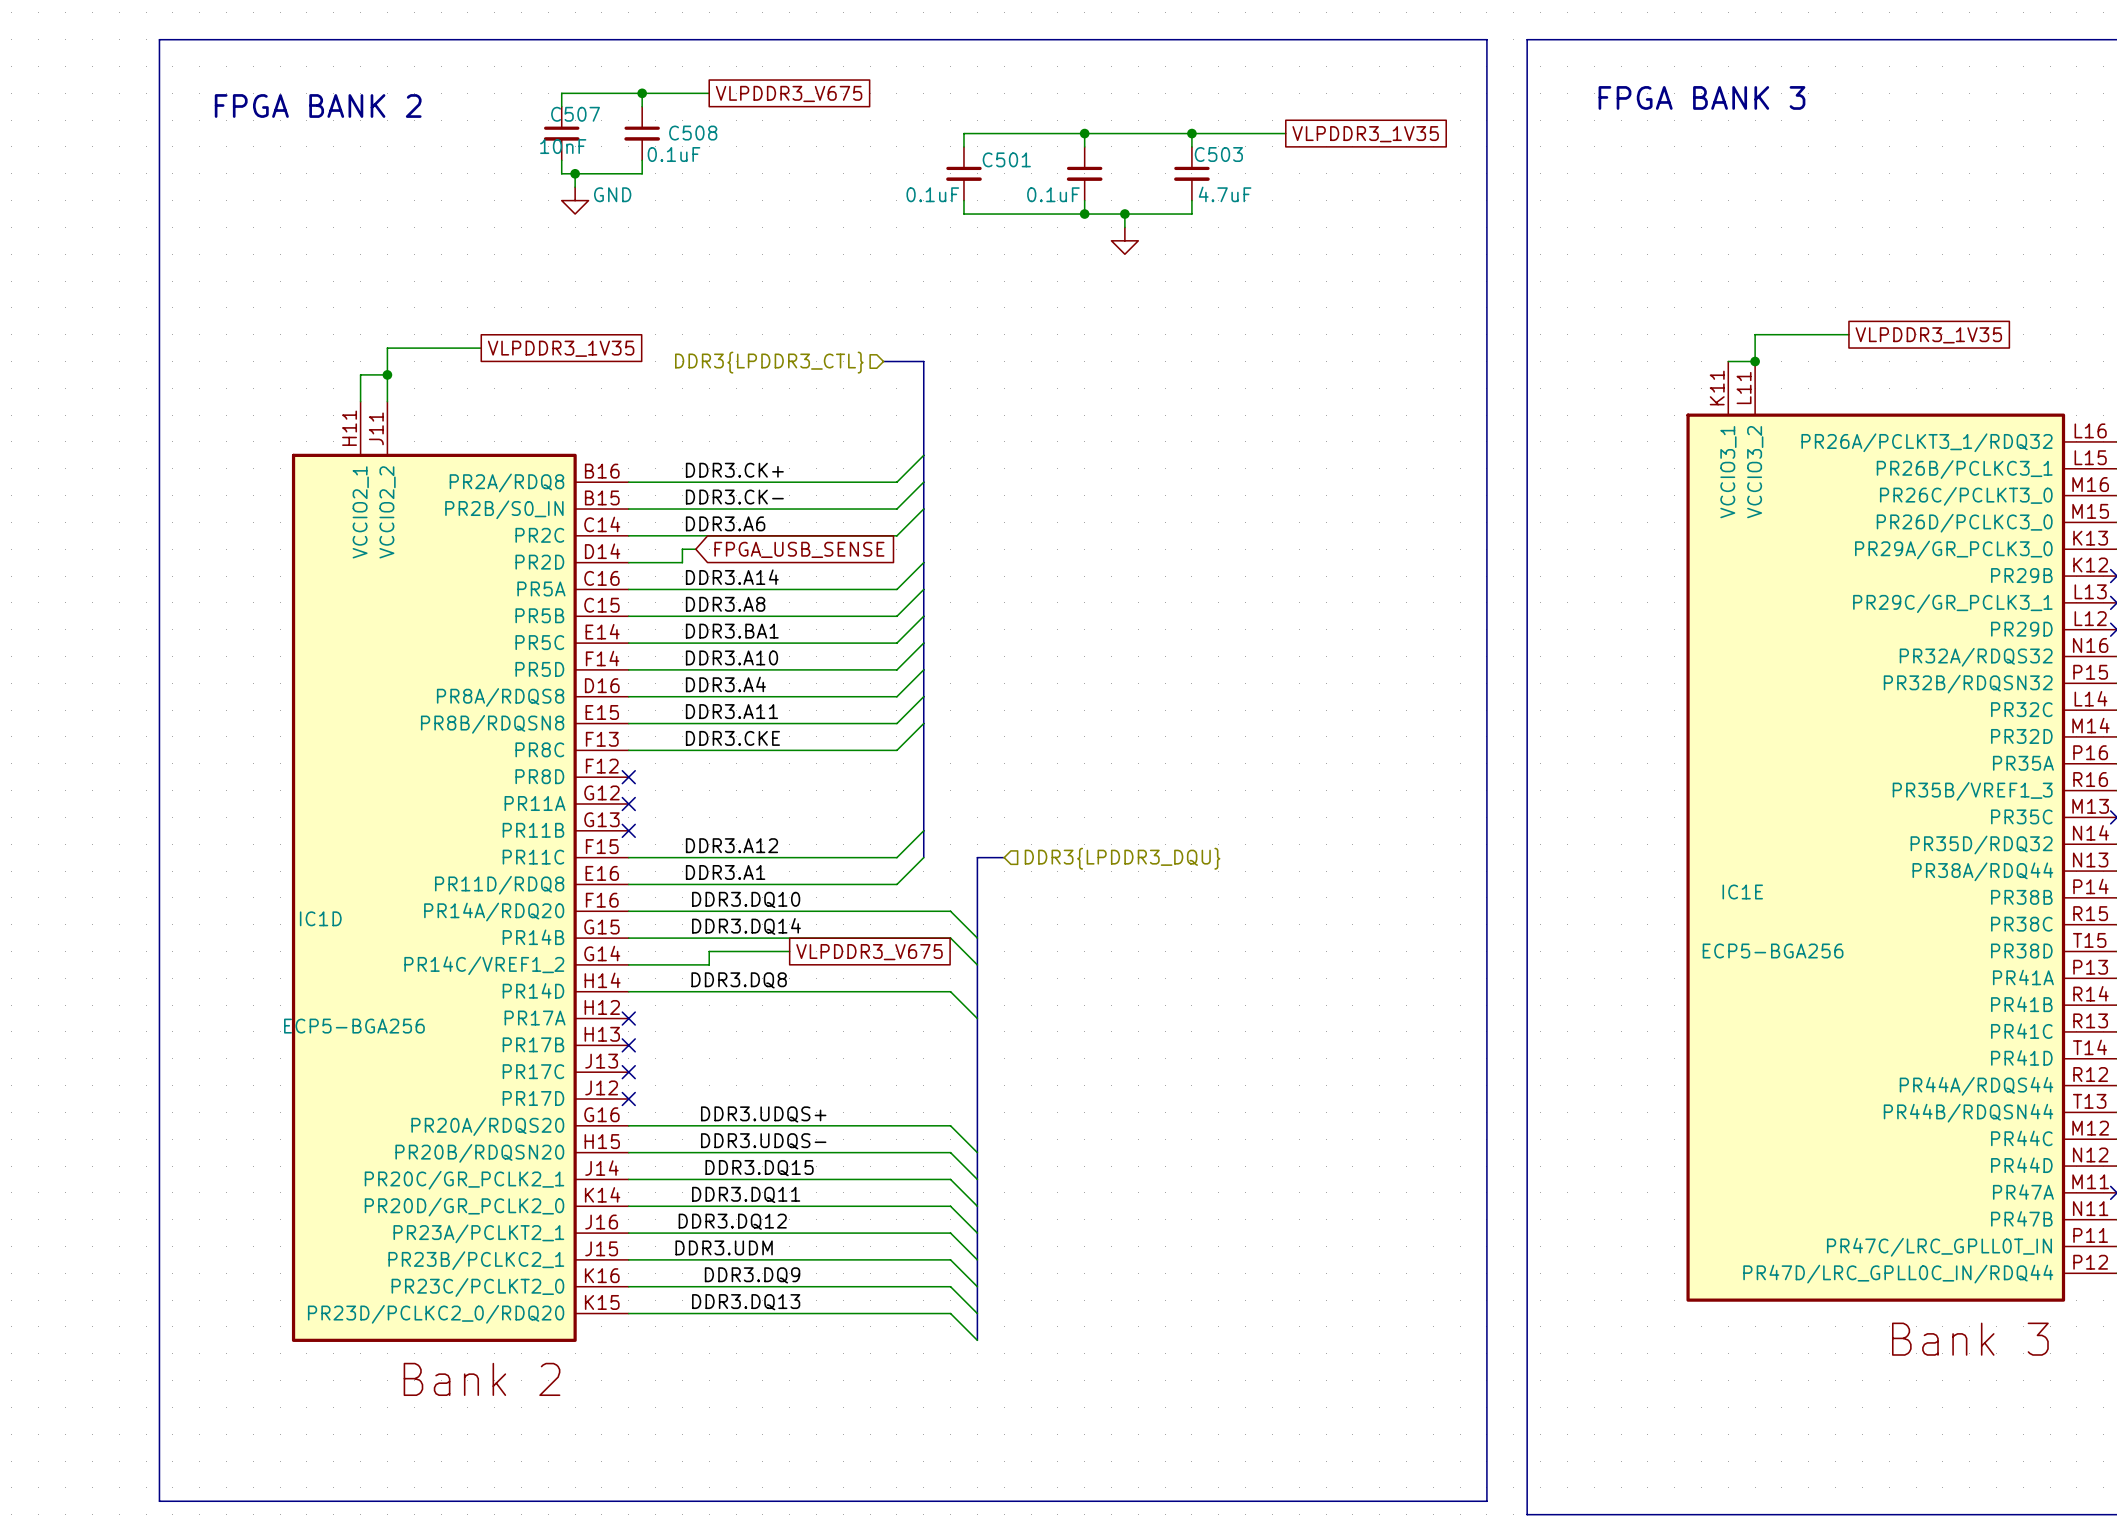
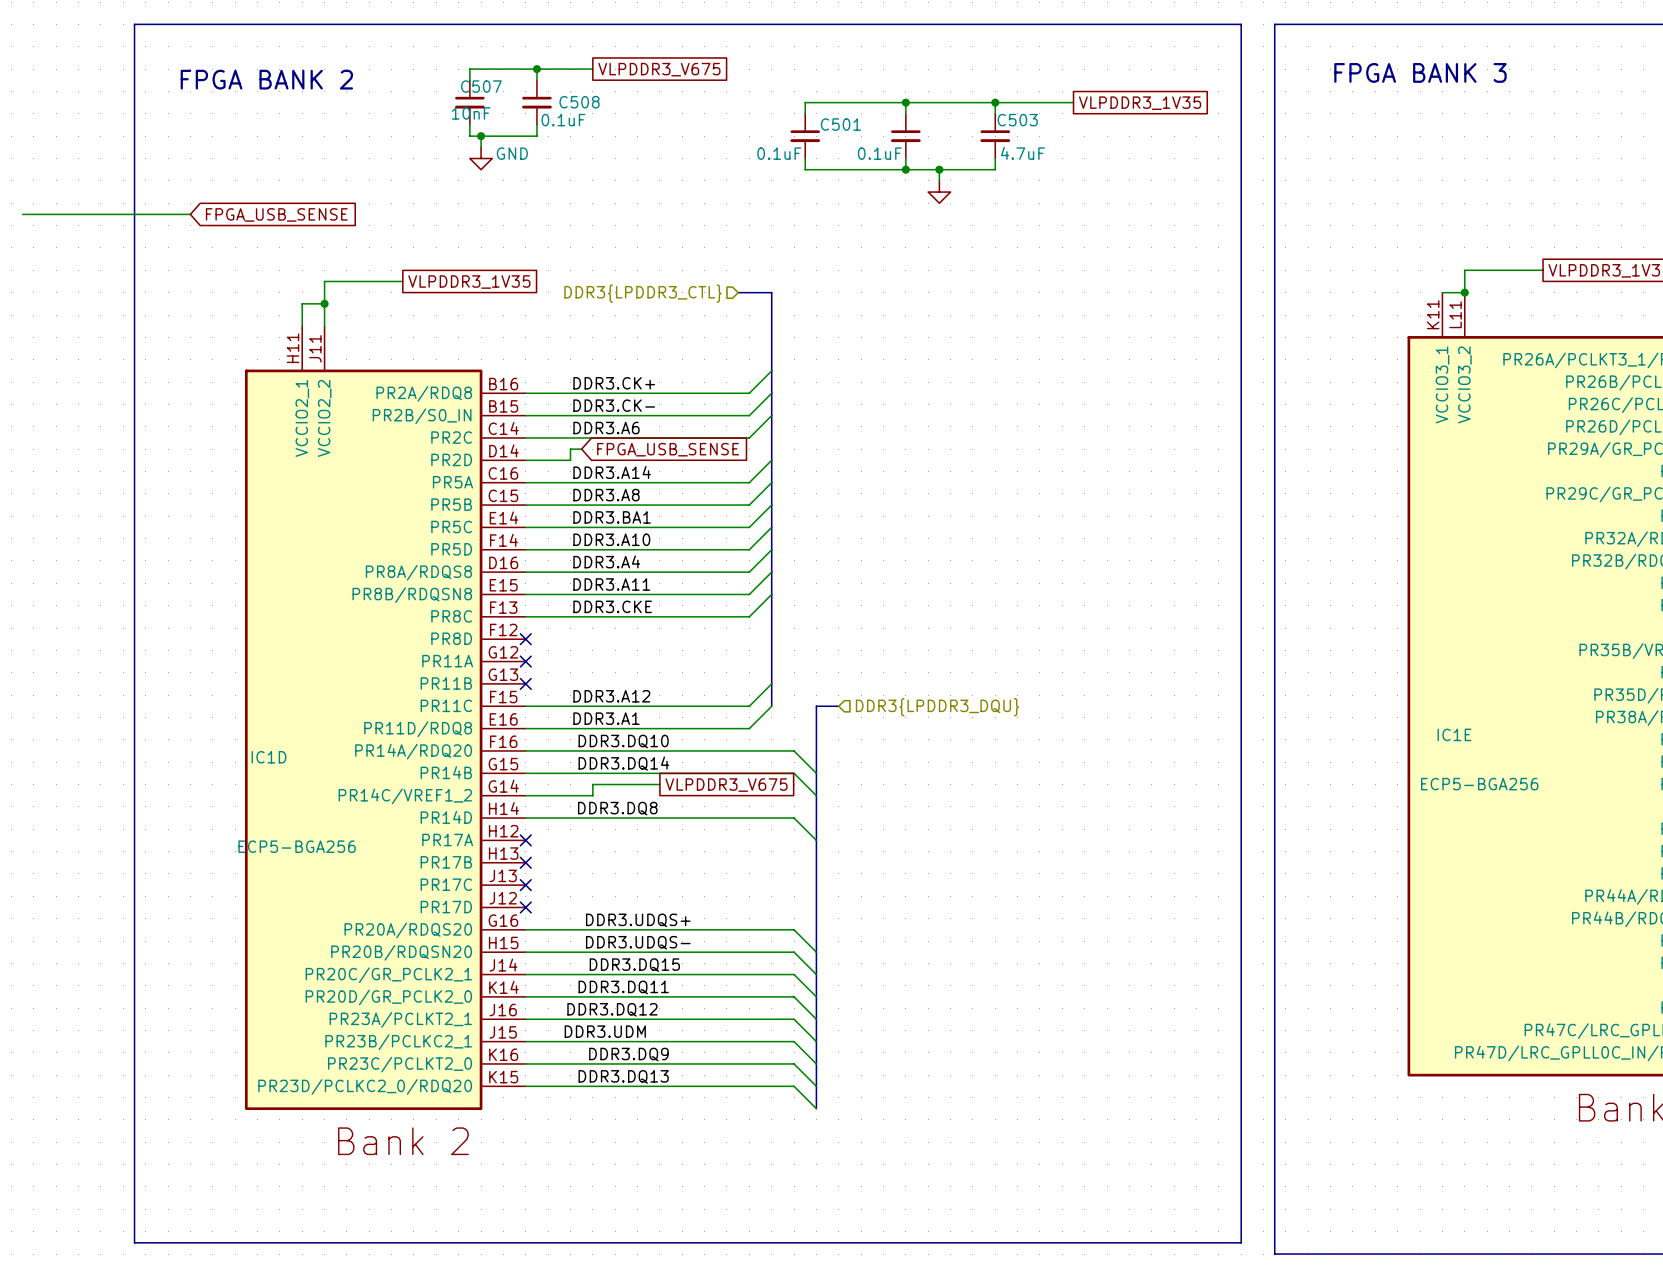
wire: none -> (22, 214) (190, 214)
global label: none -> FPGA_USB_SENSE (276, 214)

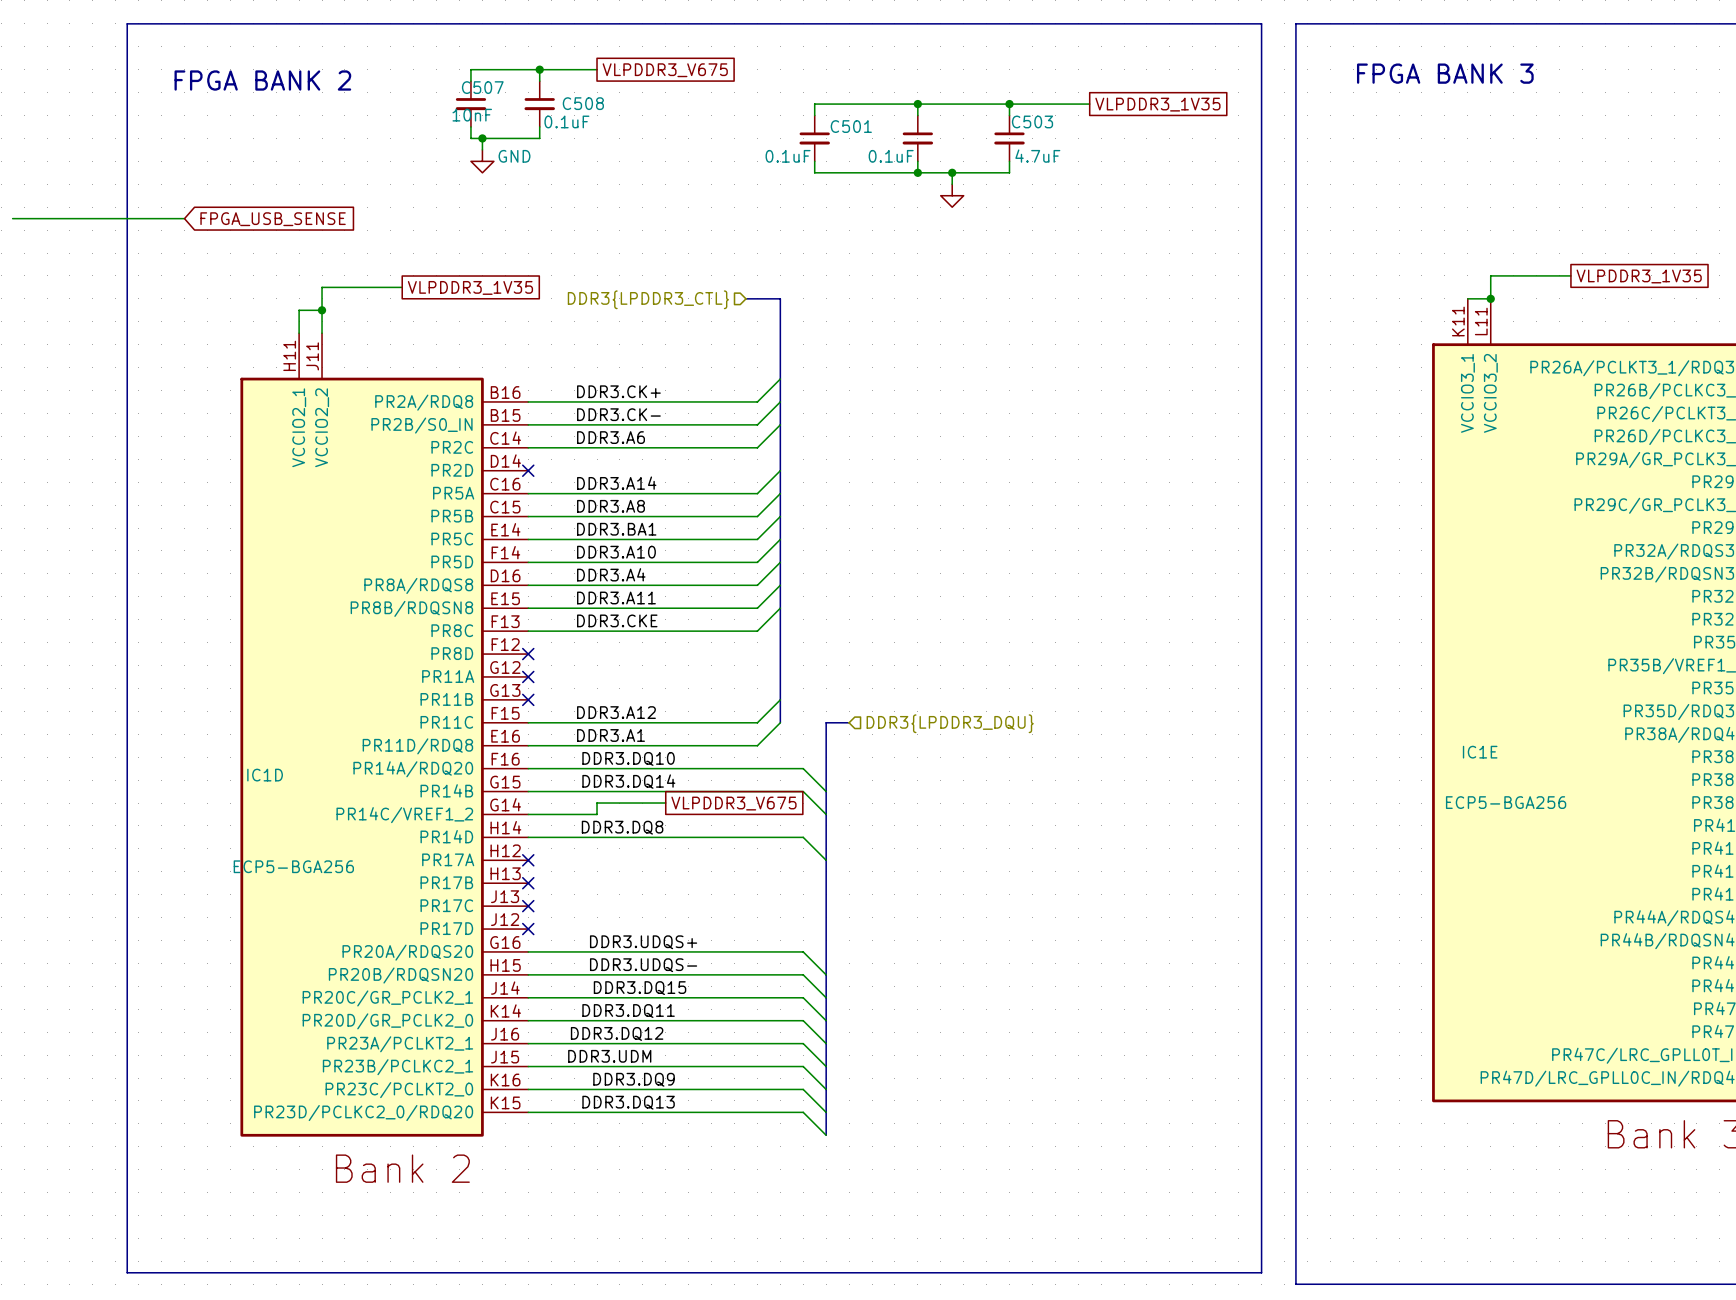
wire: (581, 449) (570, 449) (570, 460) (525, 460) -> none
global label: FPGA_USB_SENSE (668, 449) -> none
no-connect mark: none -> (528, 470)

